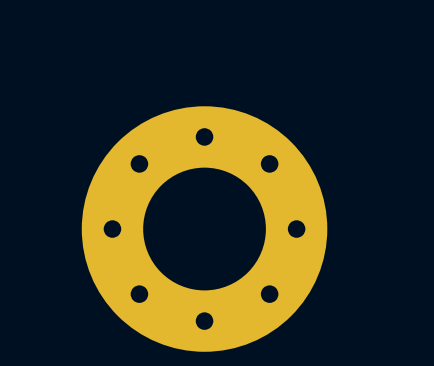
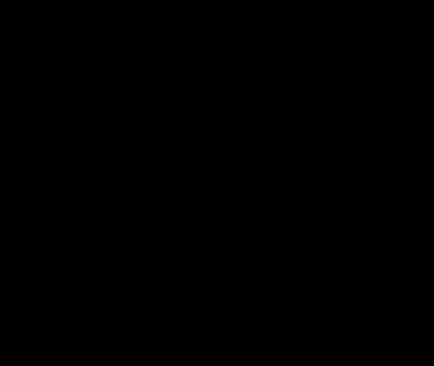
part: (204, 229) -> none

